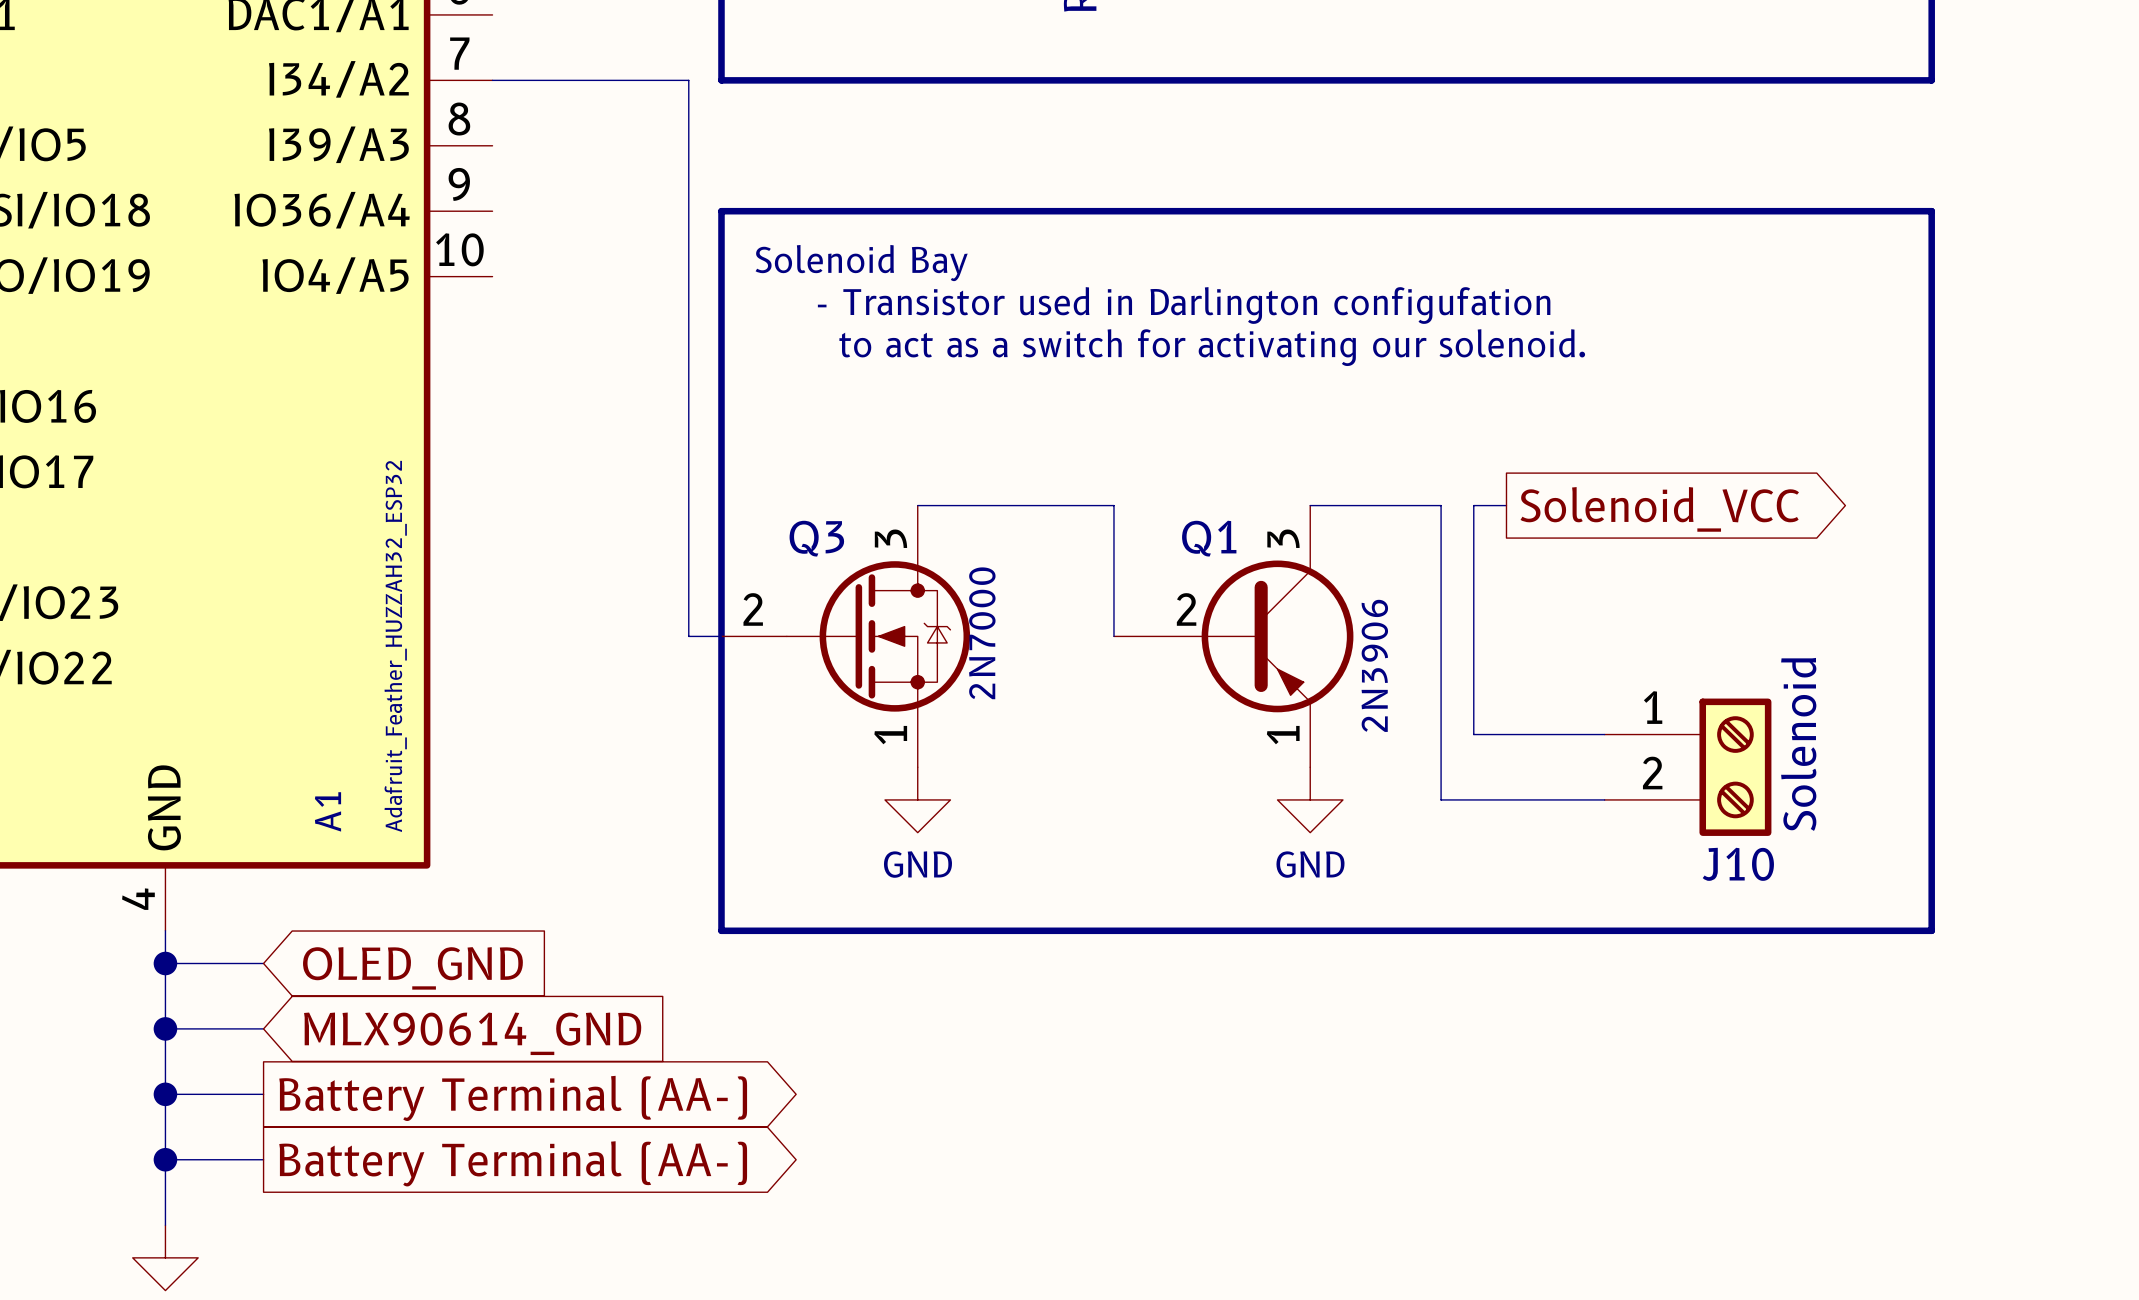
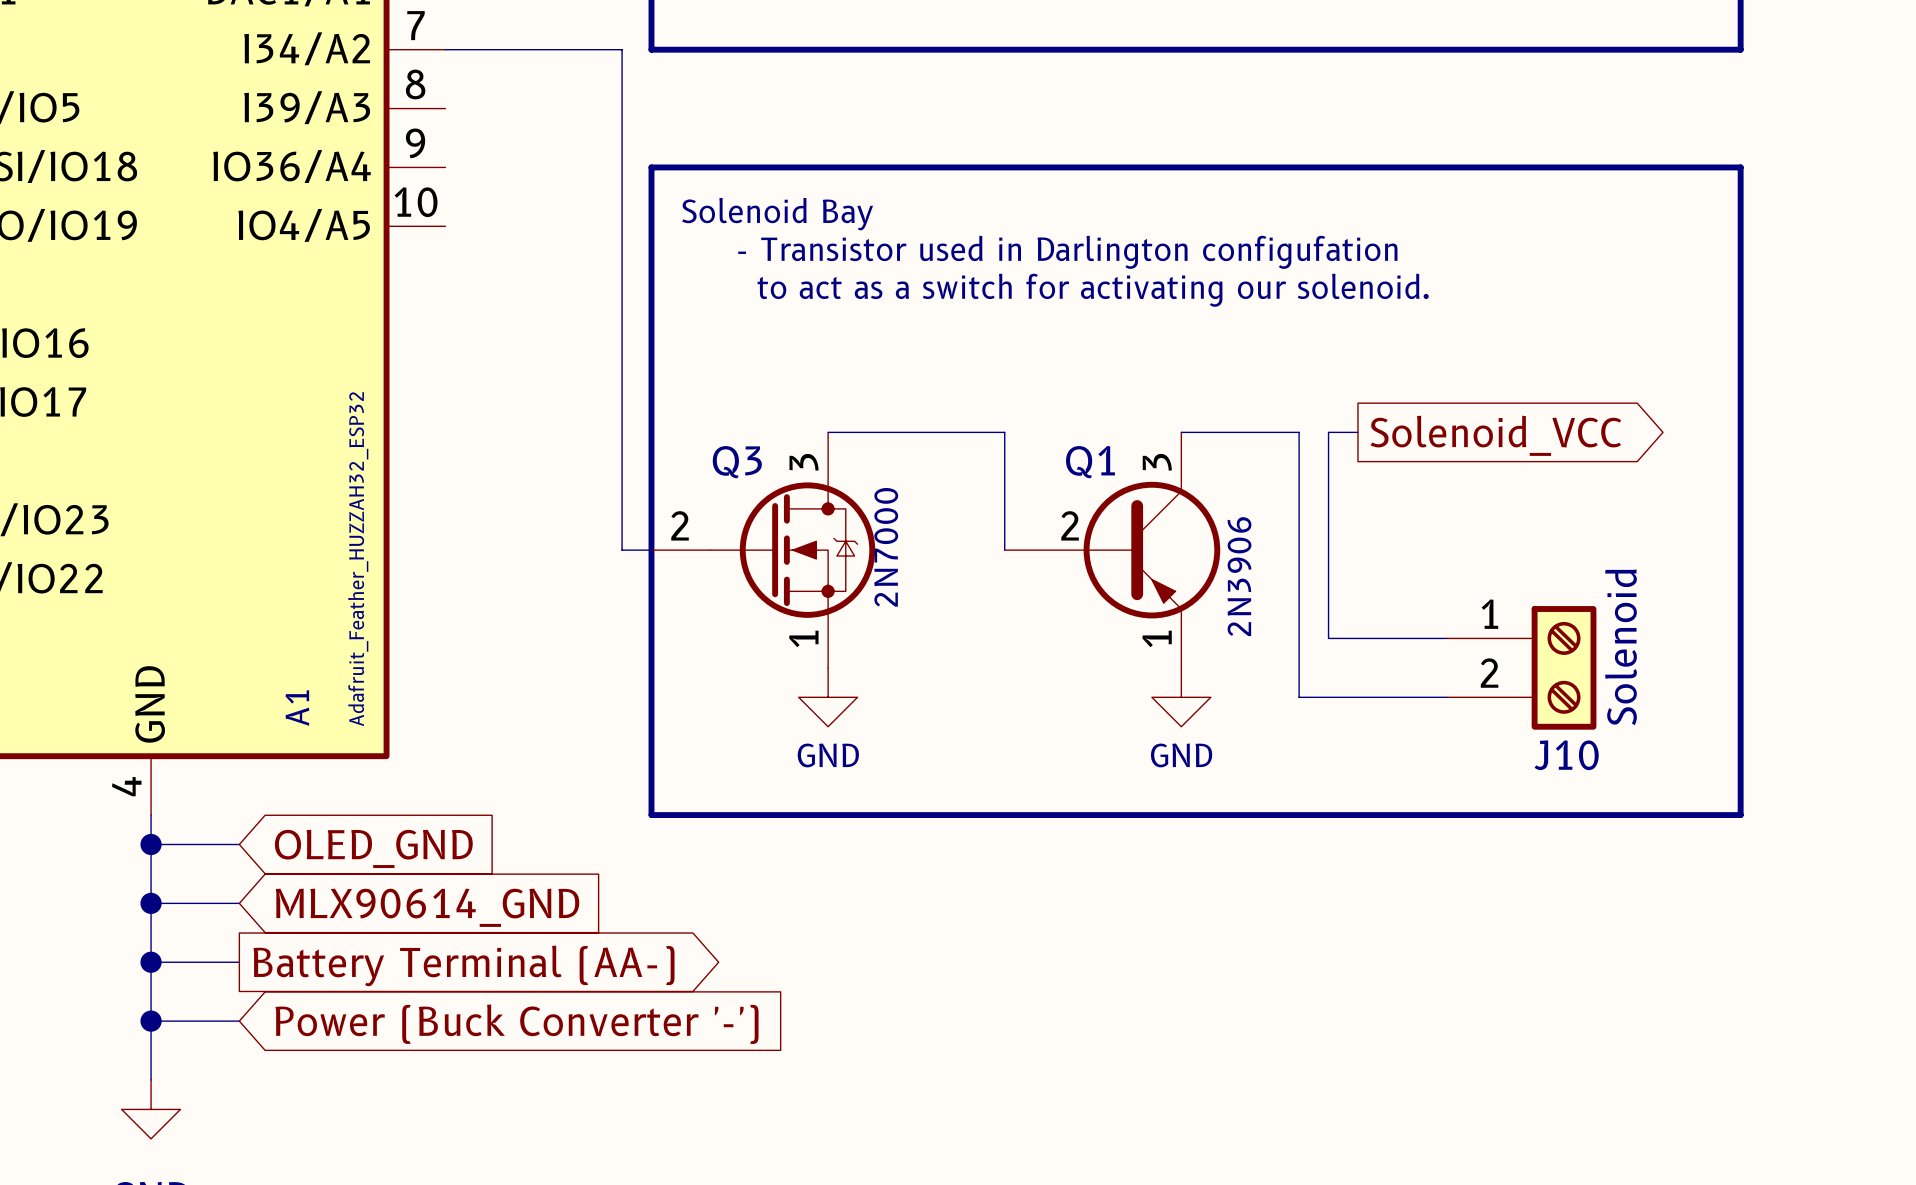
global label shape: output (513, 1163) -> input (517, 1024)
global label: Battery Terminal (AA-) (513, 1163) -> Power (Buck Converter '-') (517, 1024)

